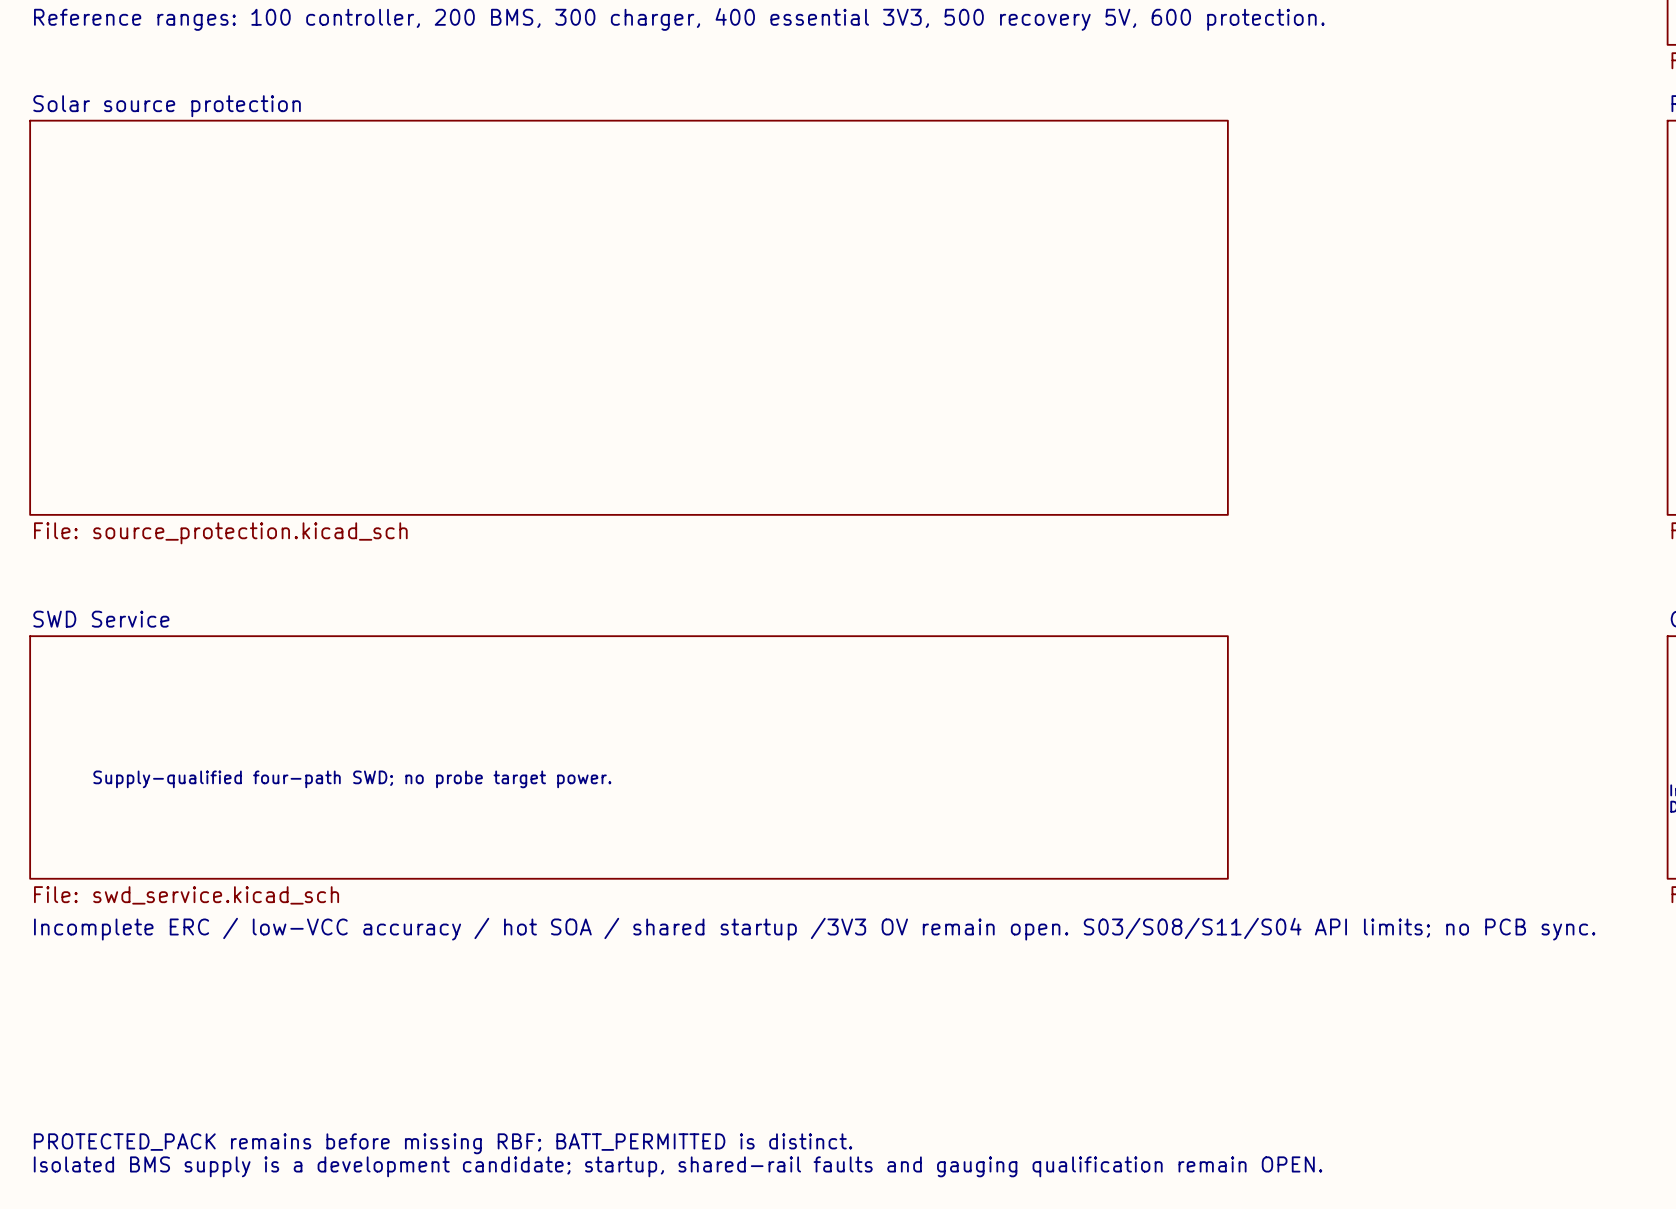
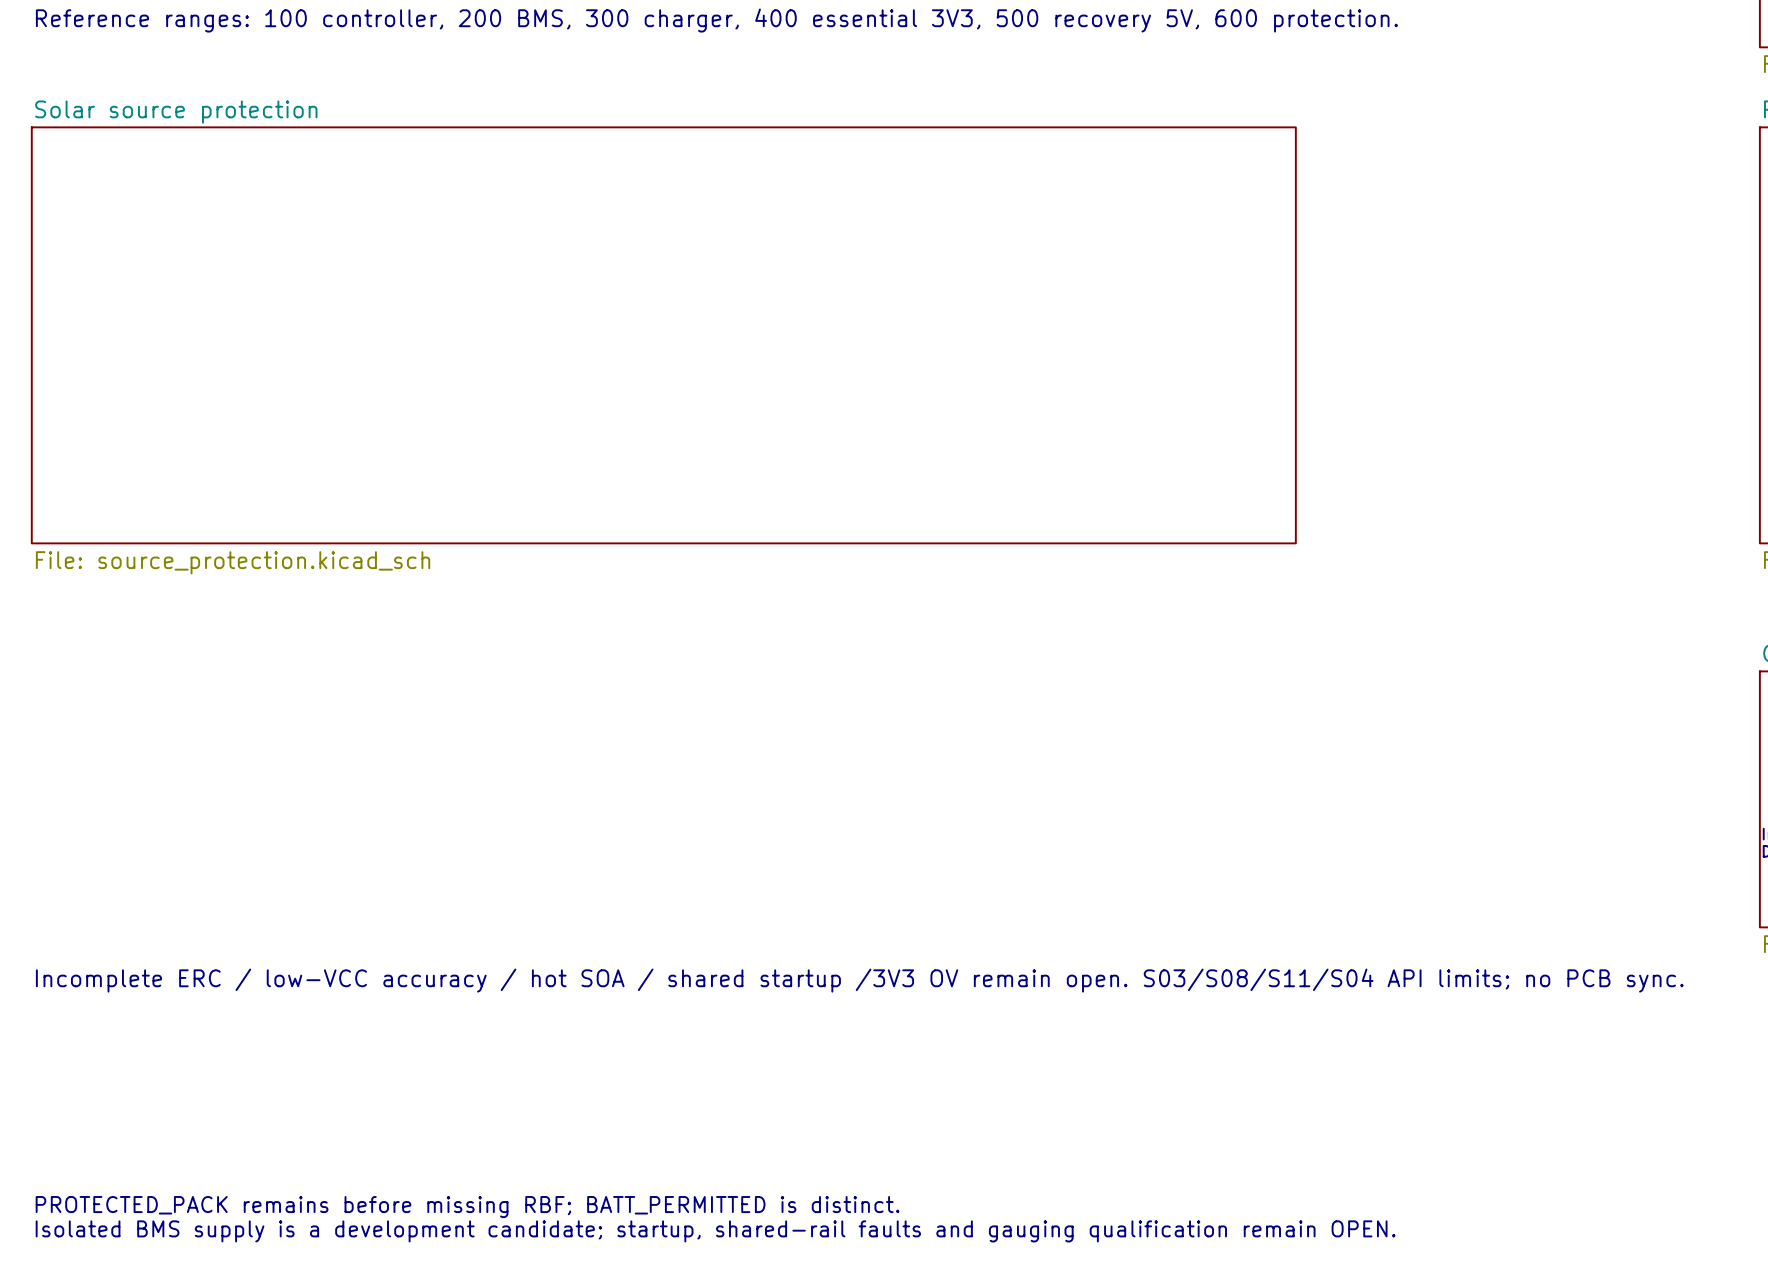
sheet SWD Service: File: swd_service.kicad_sch (629, 757) -> none
text: Supply-qualified four-path SWD; no probe target power. (352, 779) -> none

